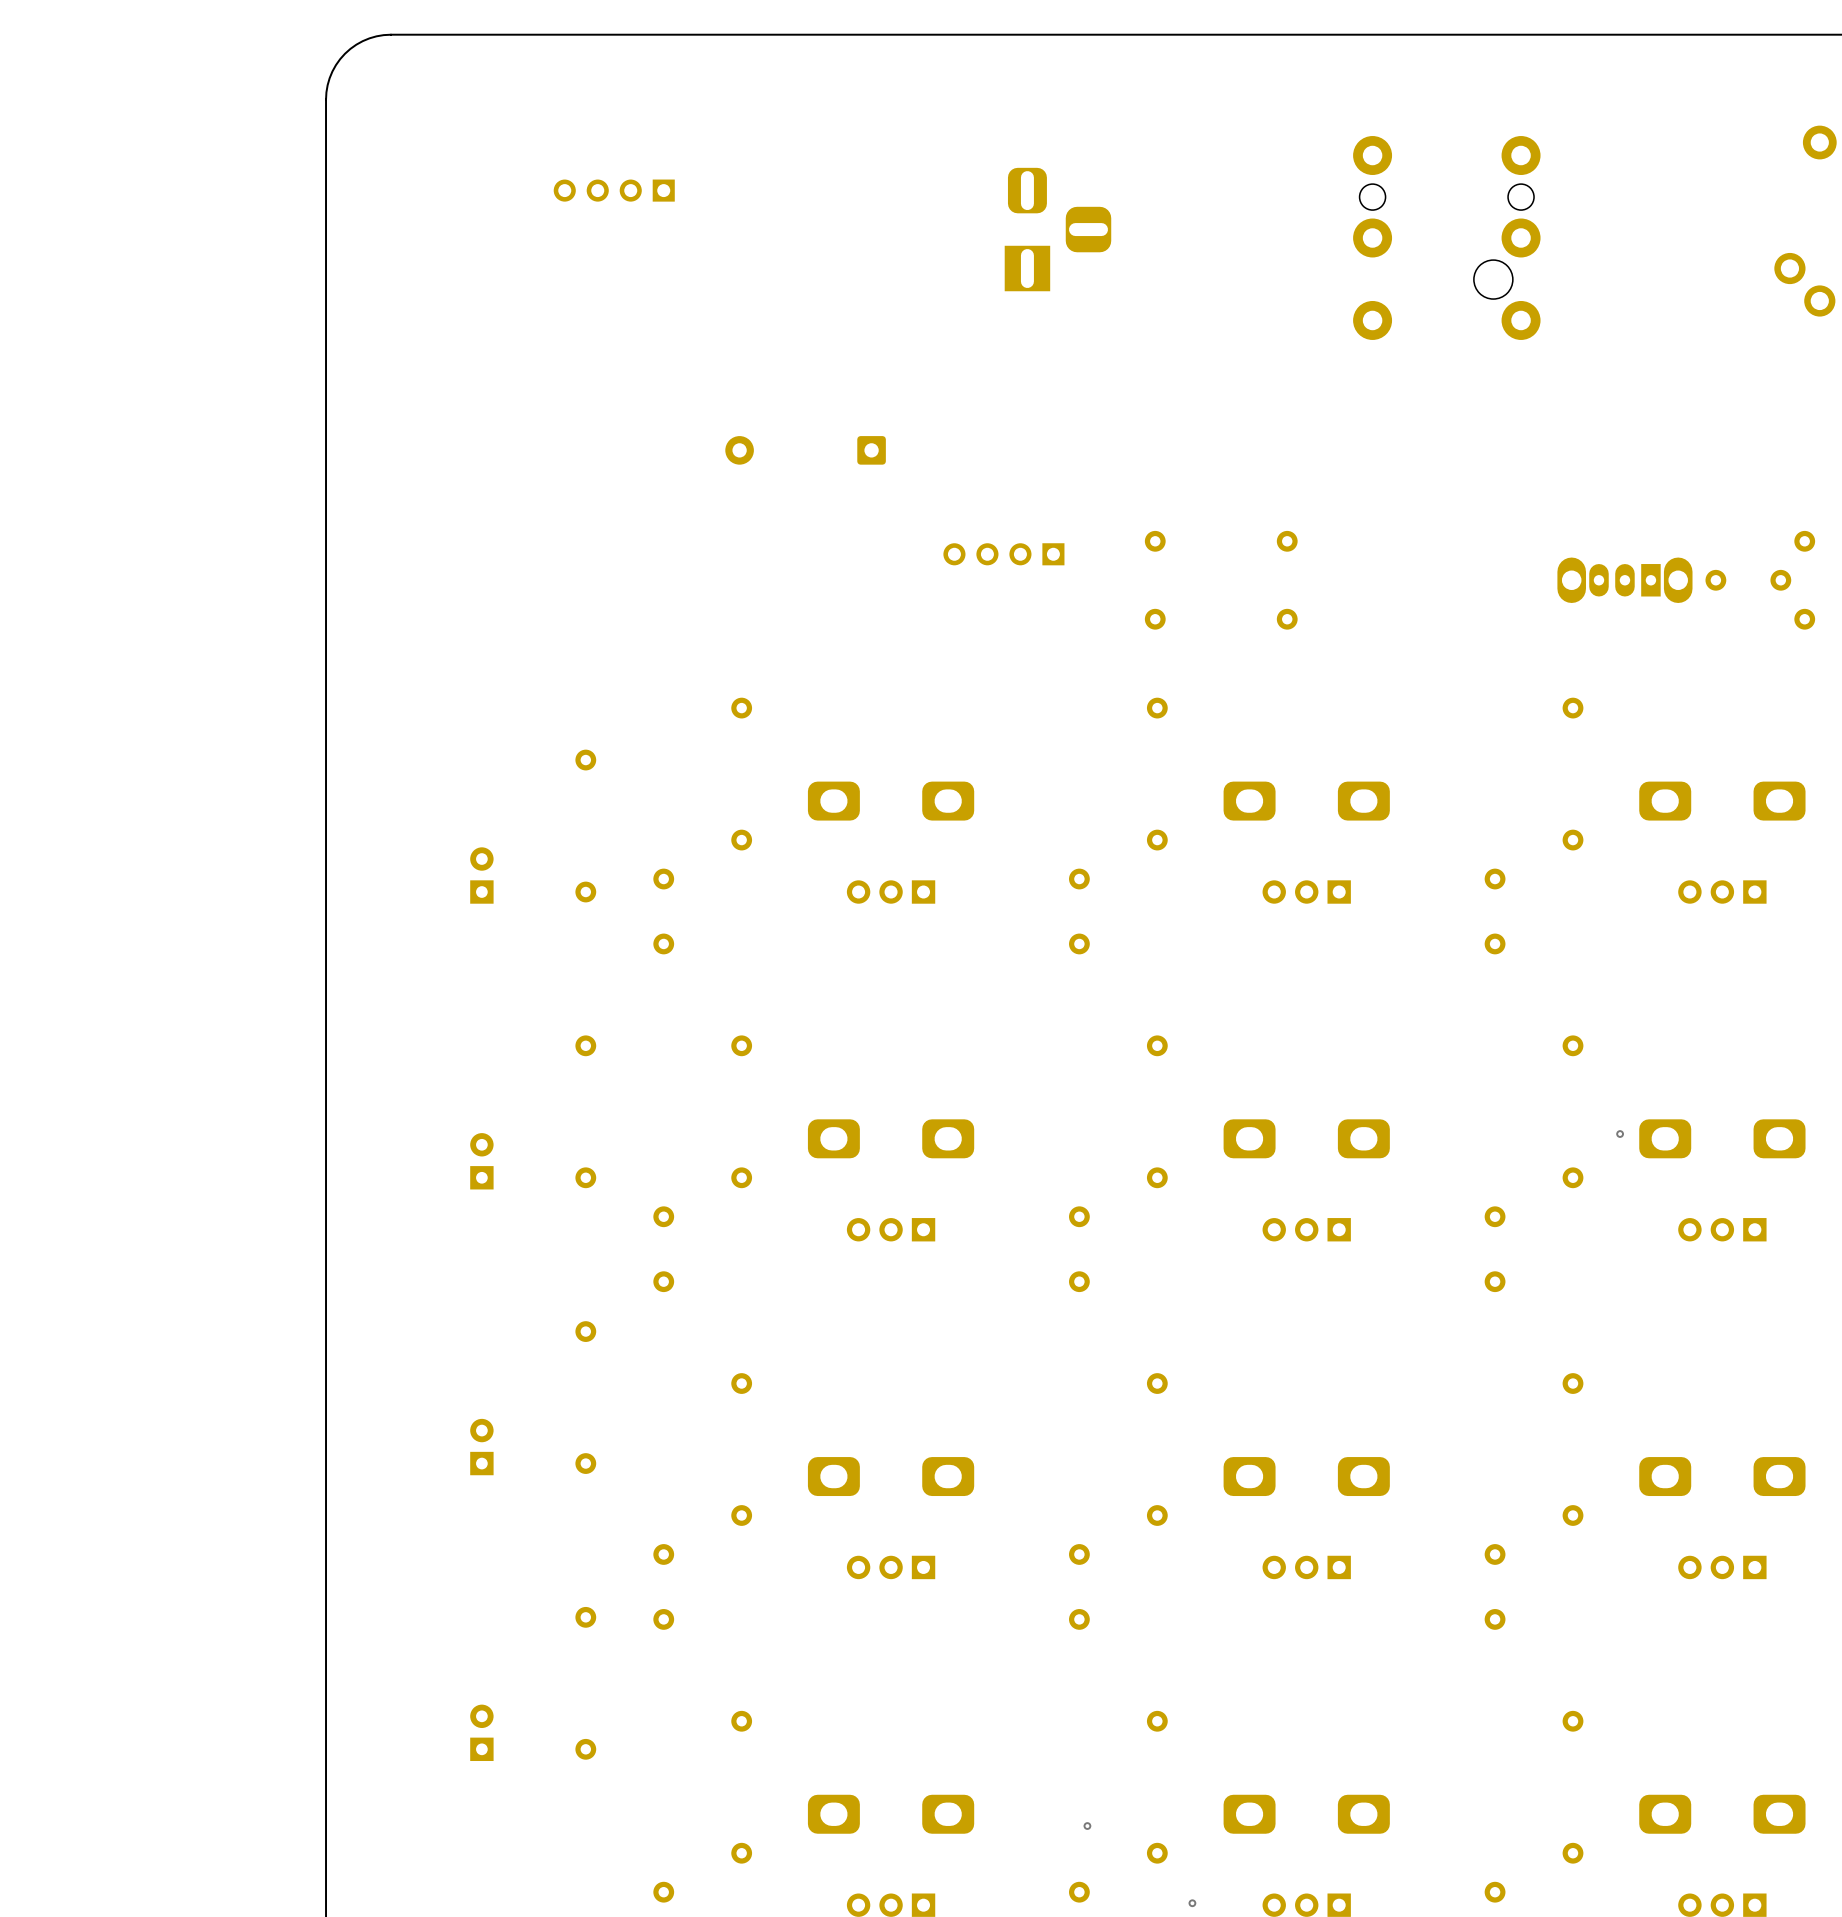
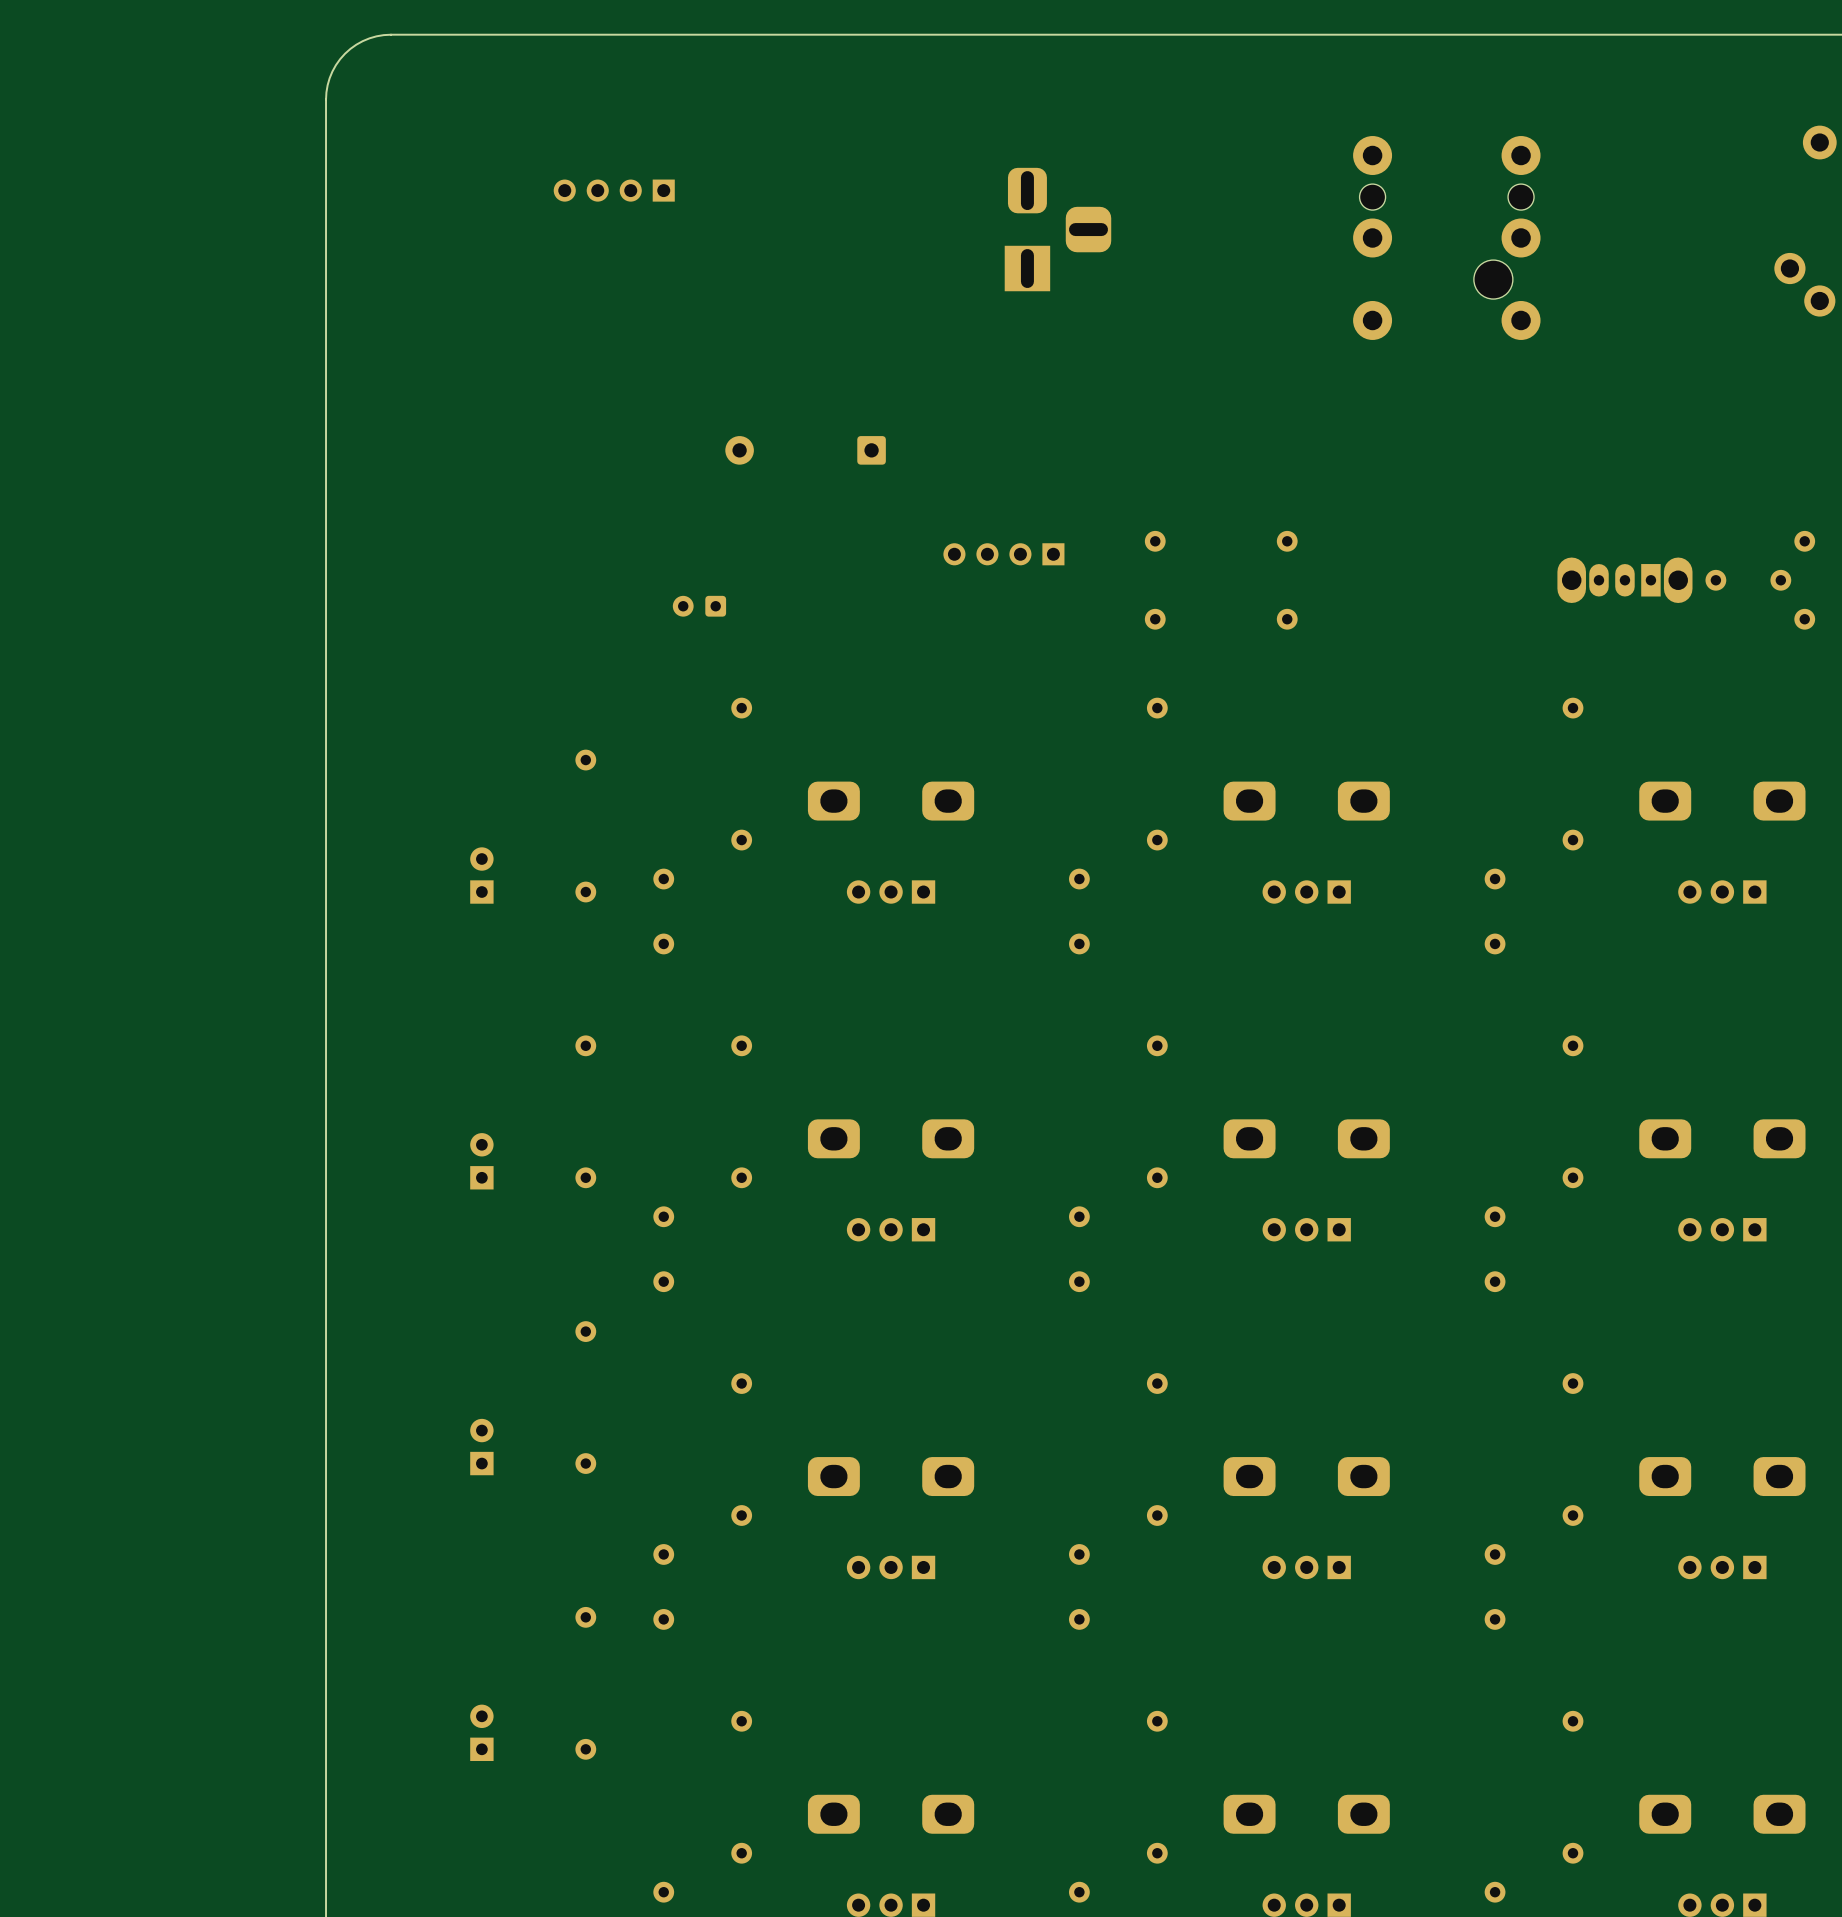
part: none -> (699, 606)
via: (1620, 1134) -> none
via: (1087, 1826) -> none
via: (1192, 1903) -> none

